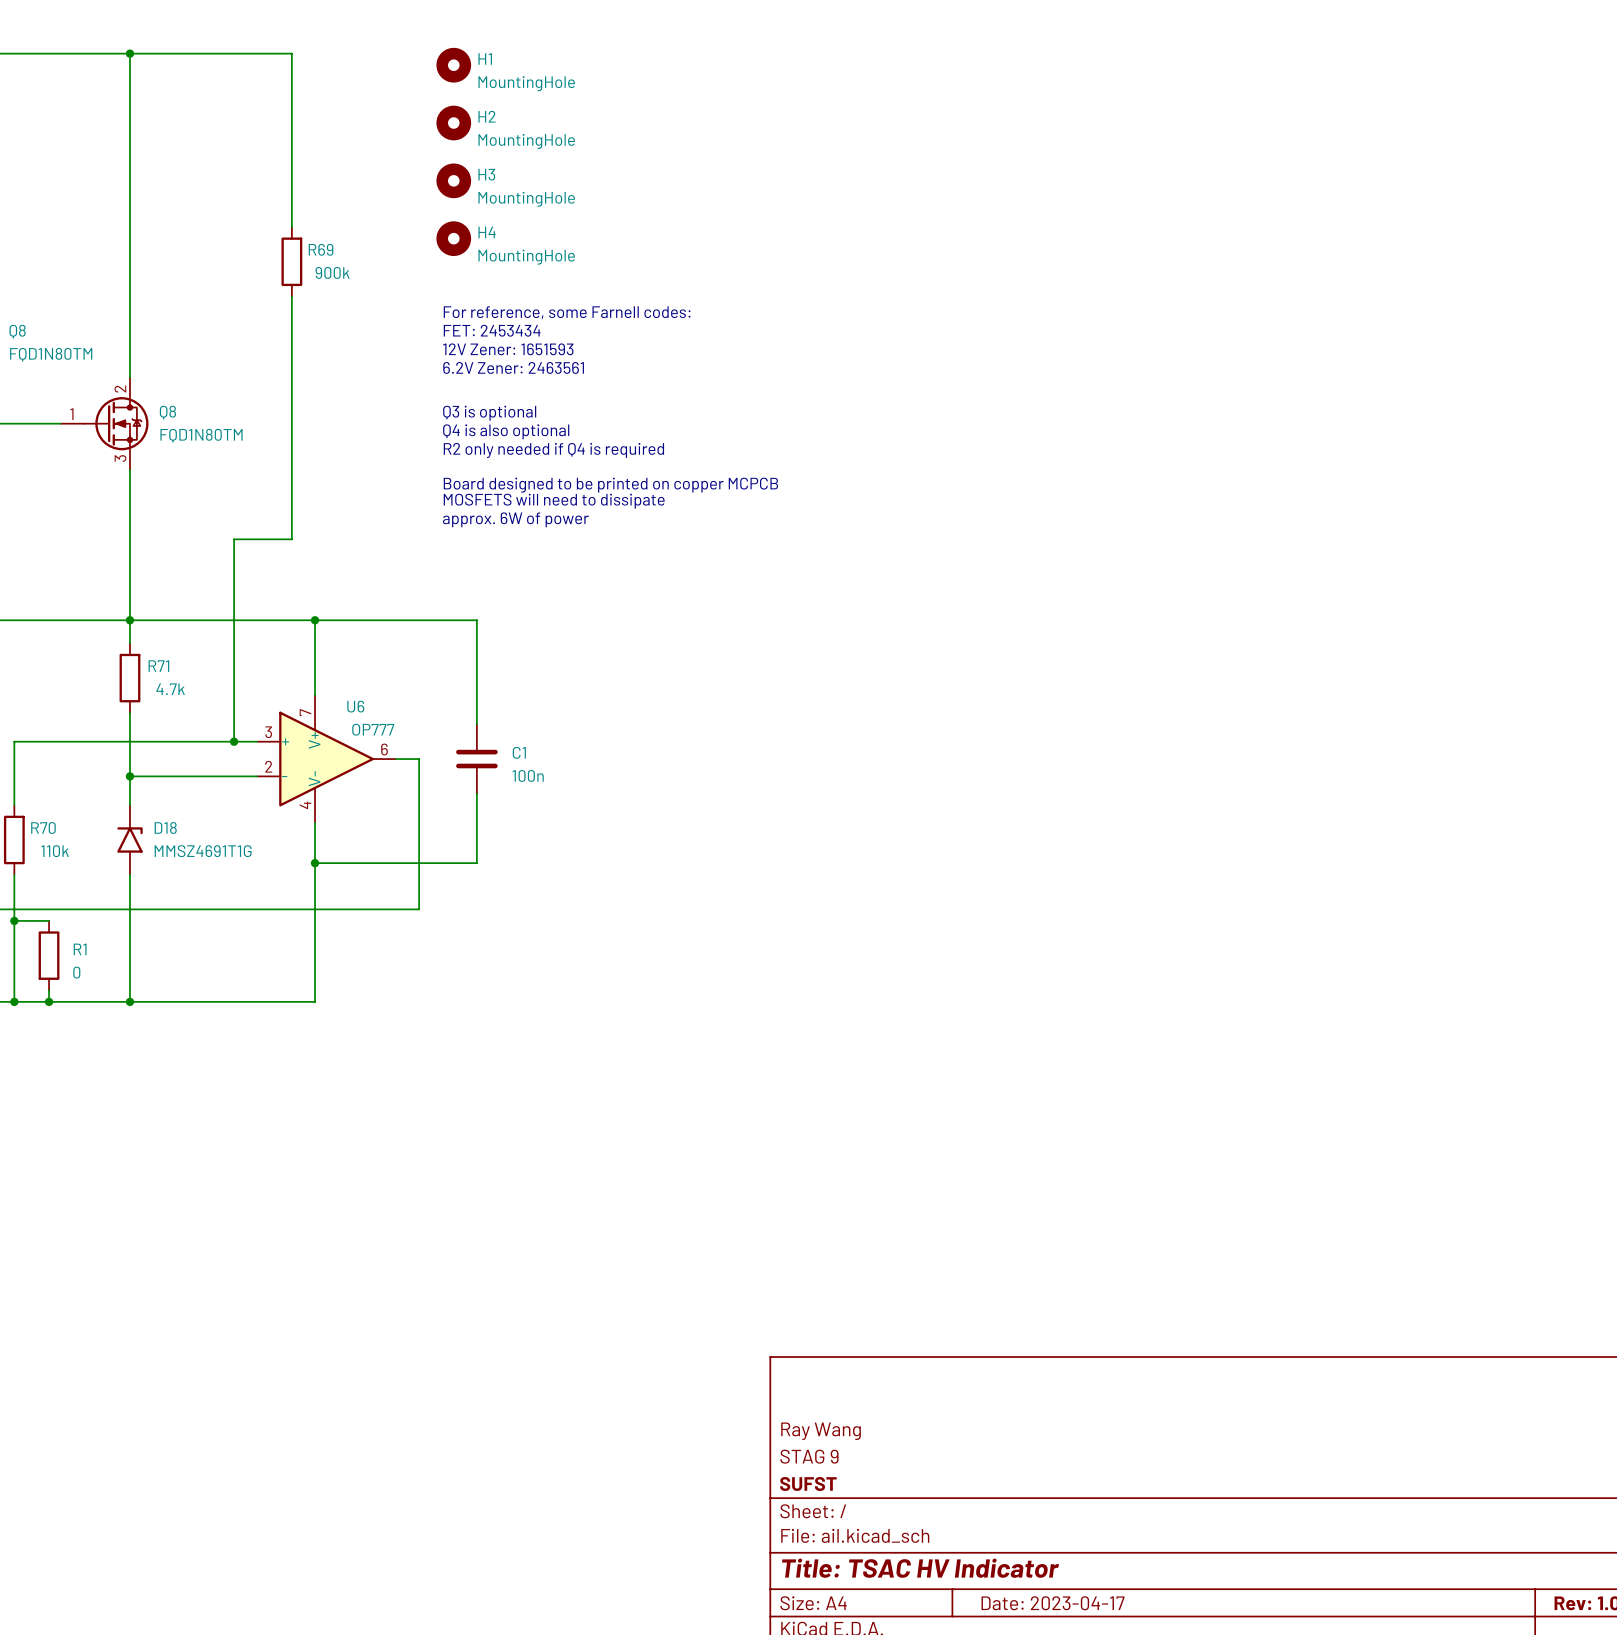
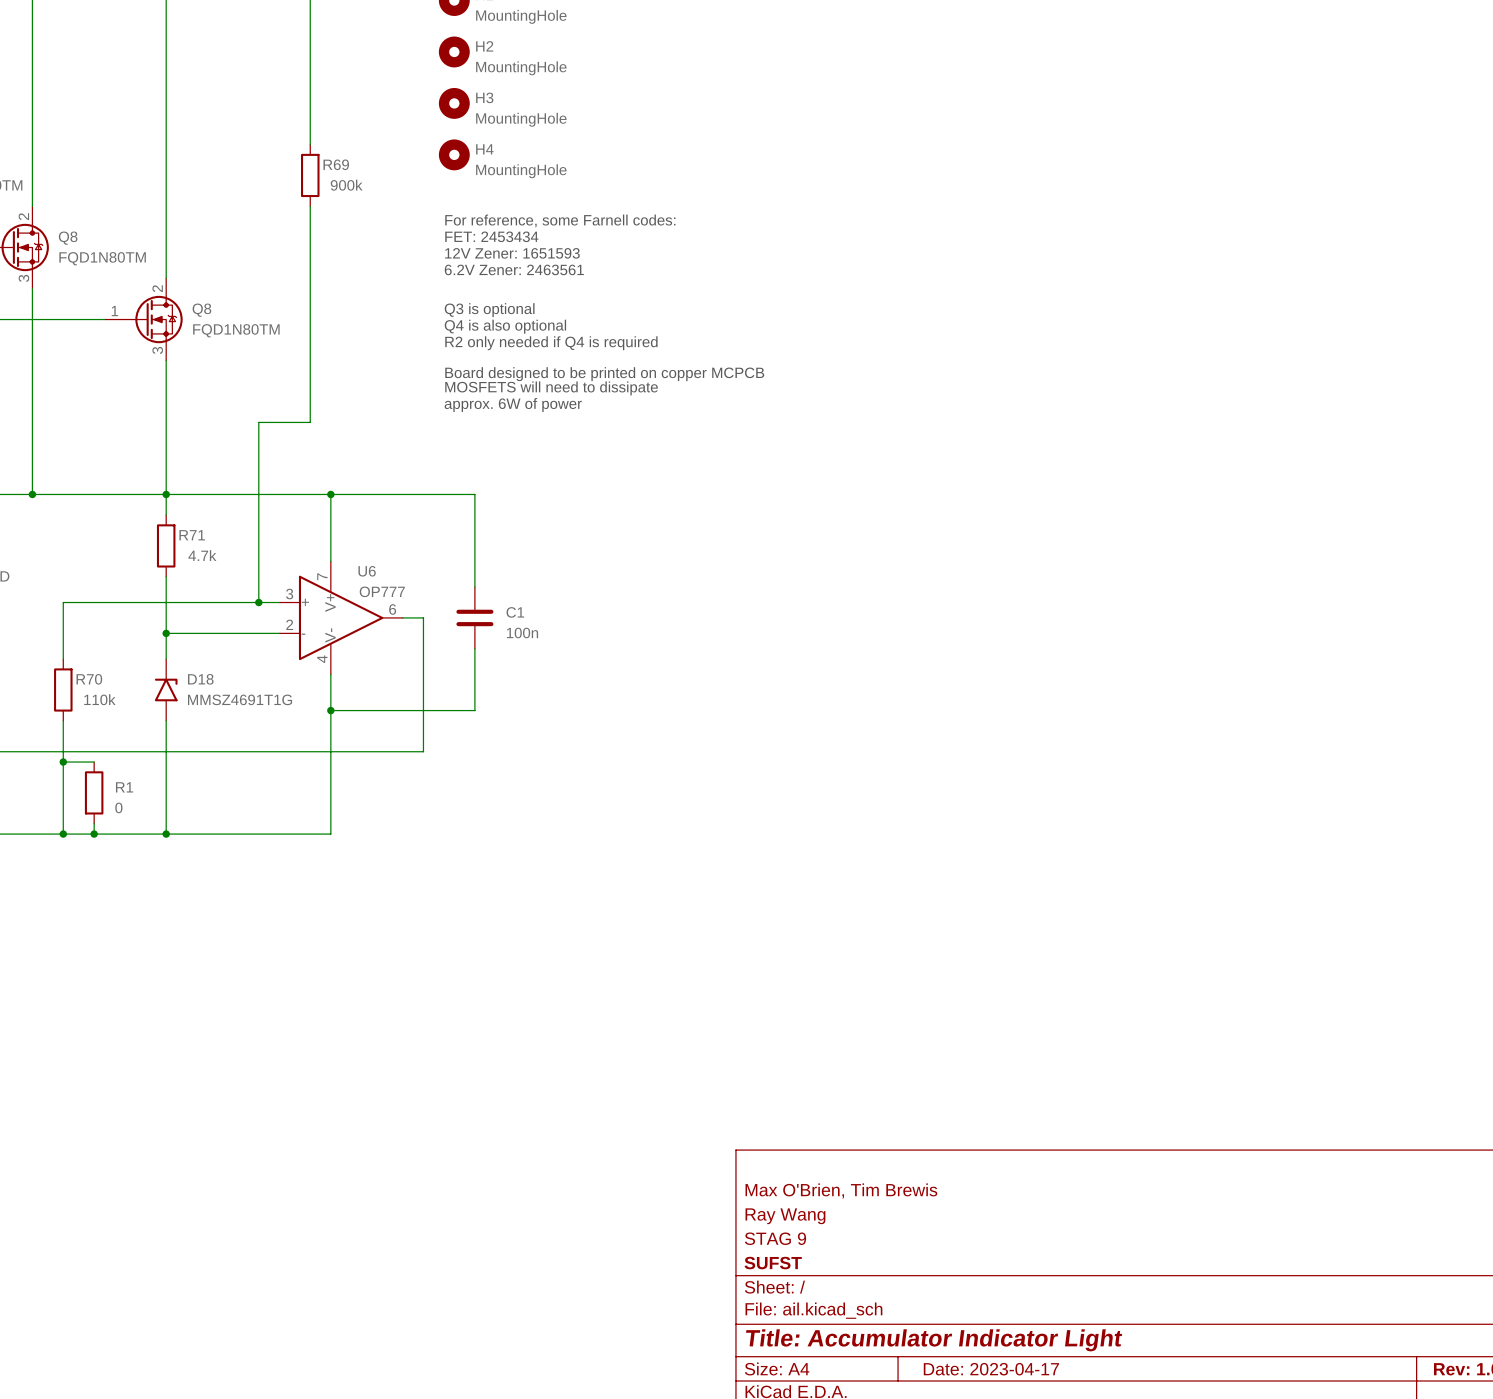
title block: none -> Max O'Brien, Tim Brewis (841, 1190)
title block: Title: TSAC HV Indicator (920, 1568) -> Title: Accumulator Indicator Light (934, 1340)

